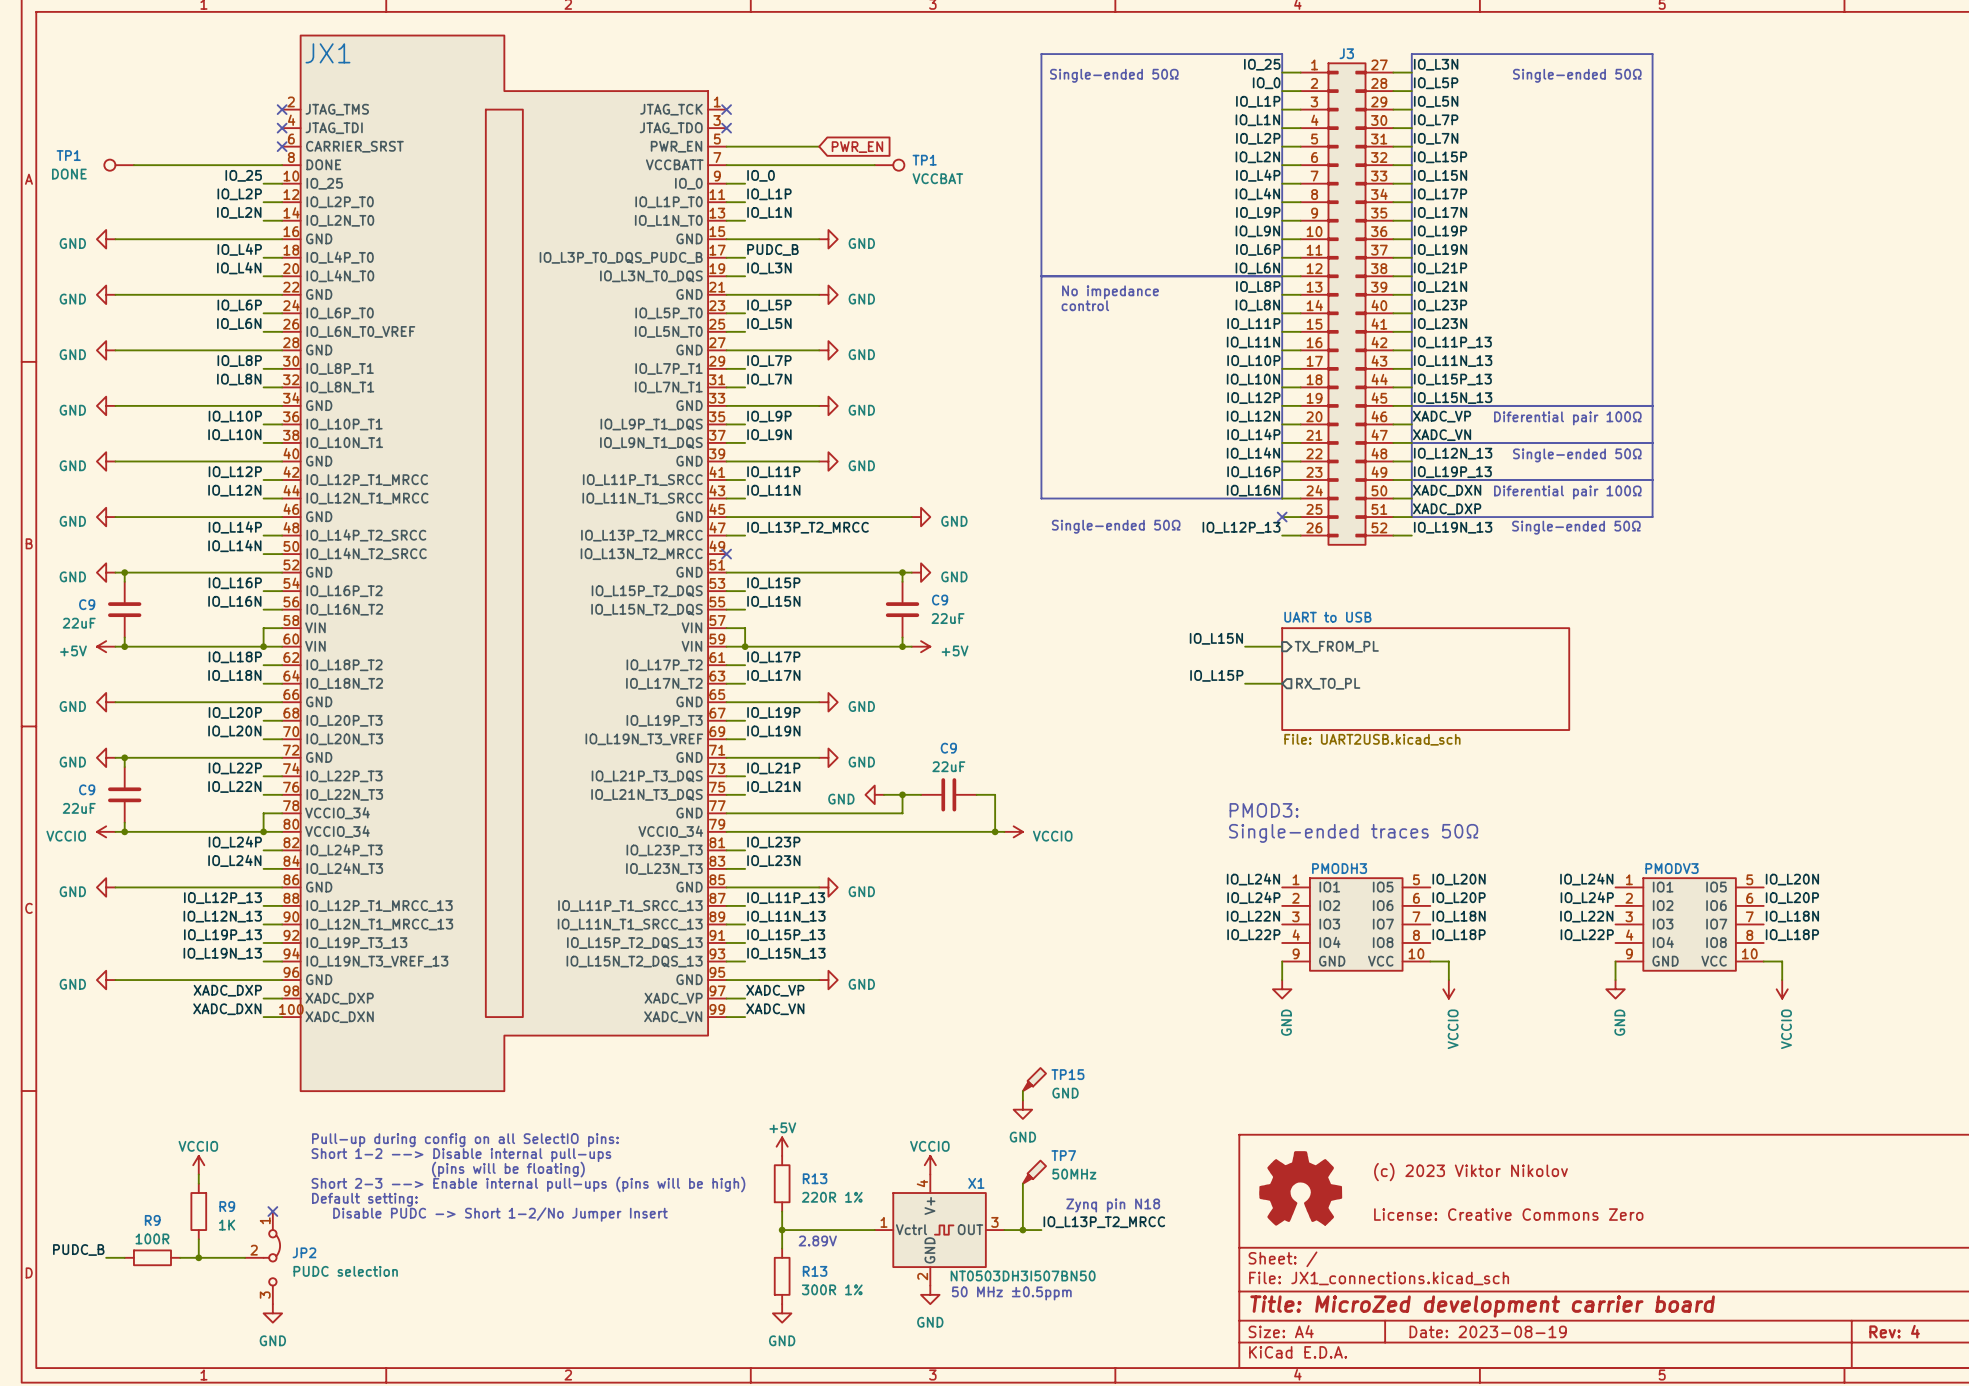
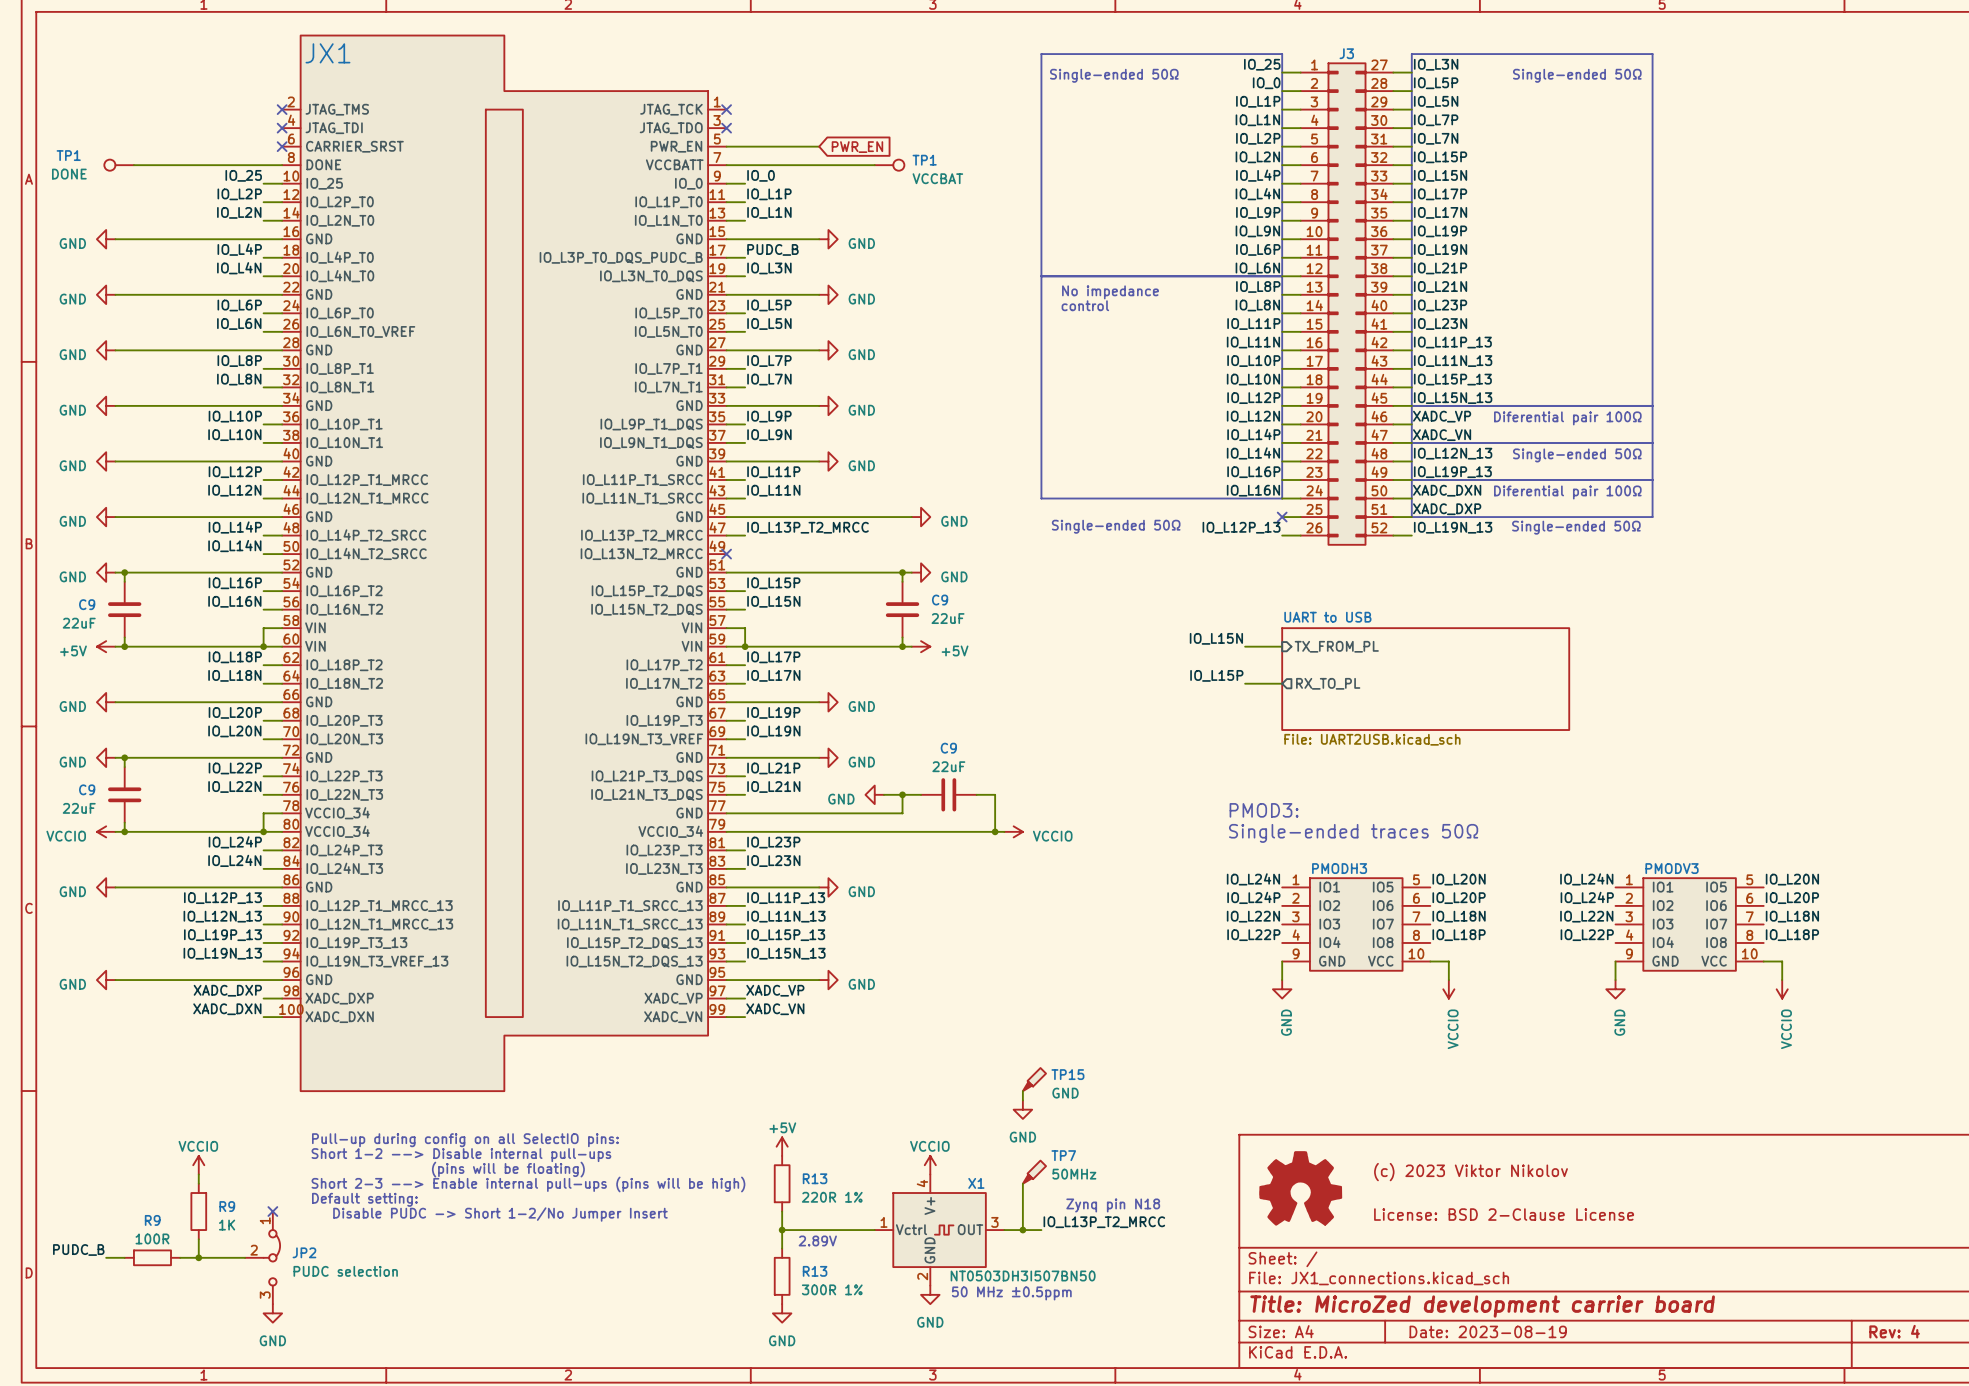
title block: License: Creative Commons Zero (1508, 1214) -> License: BSD 2-Clause License (1504, 1214)

